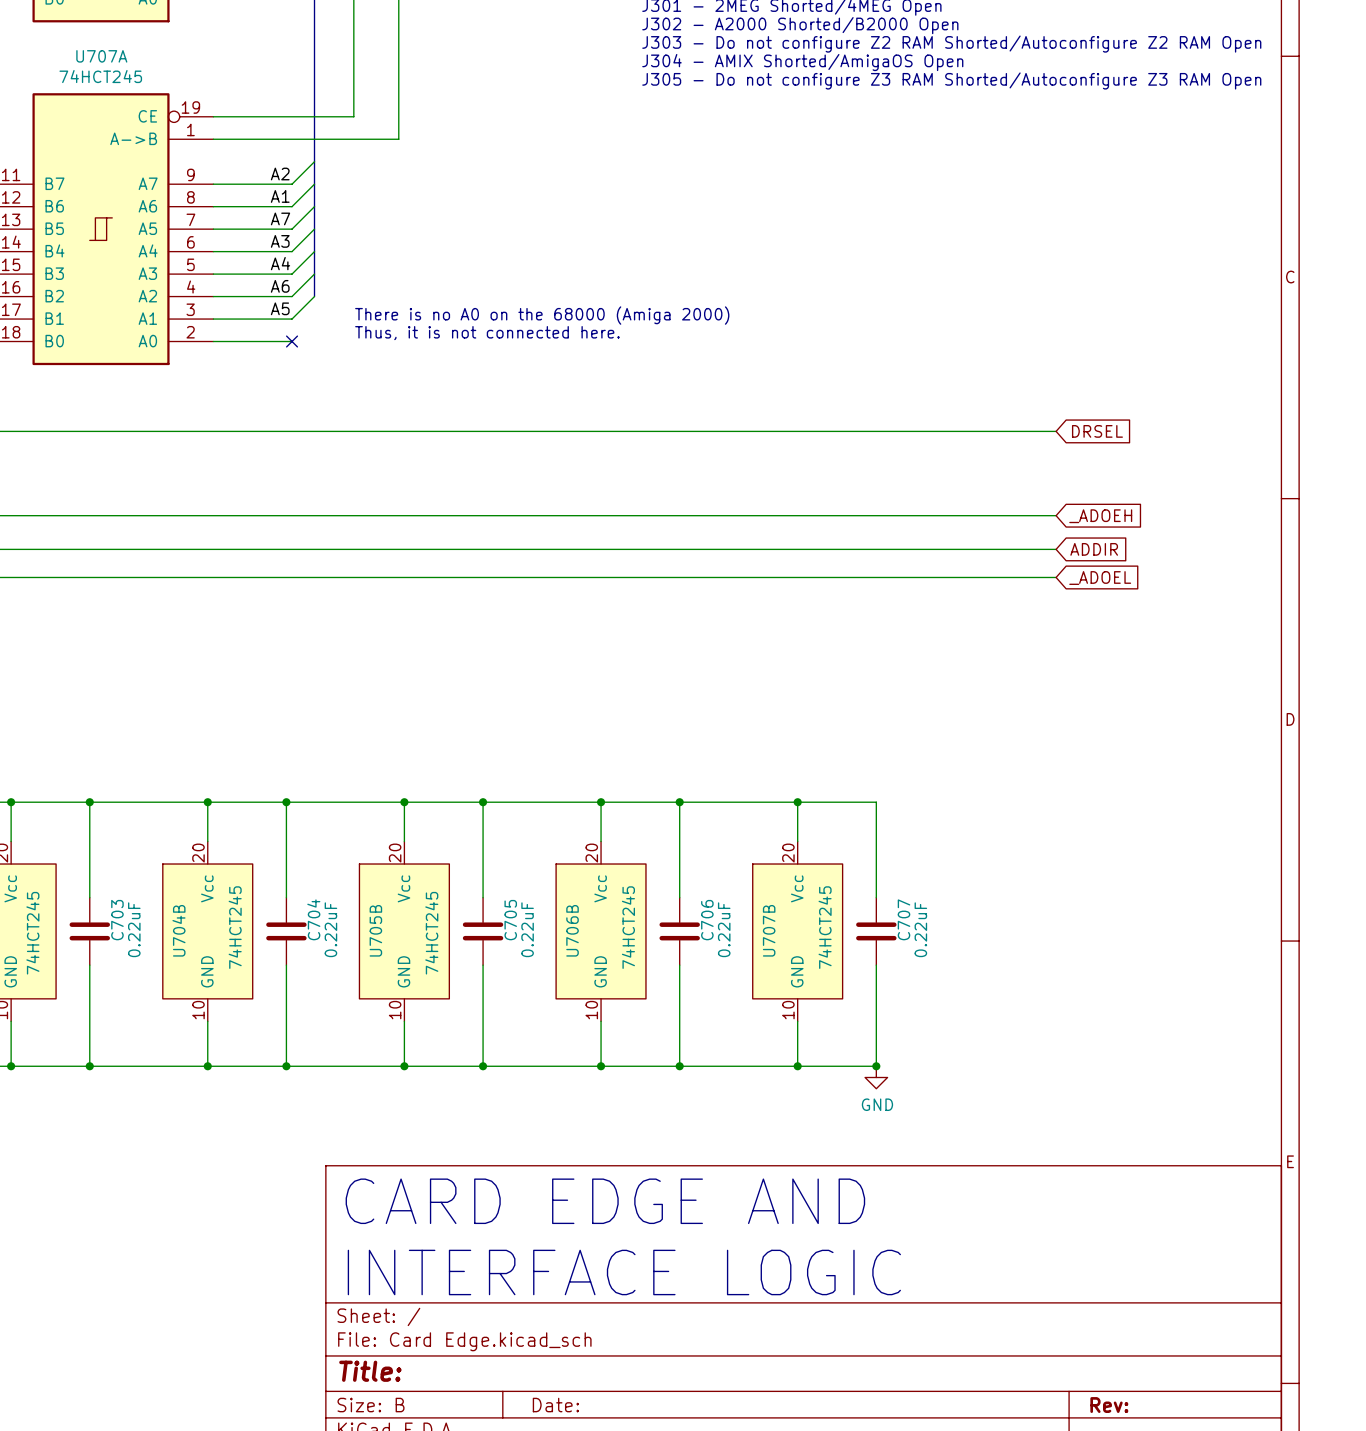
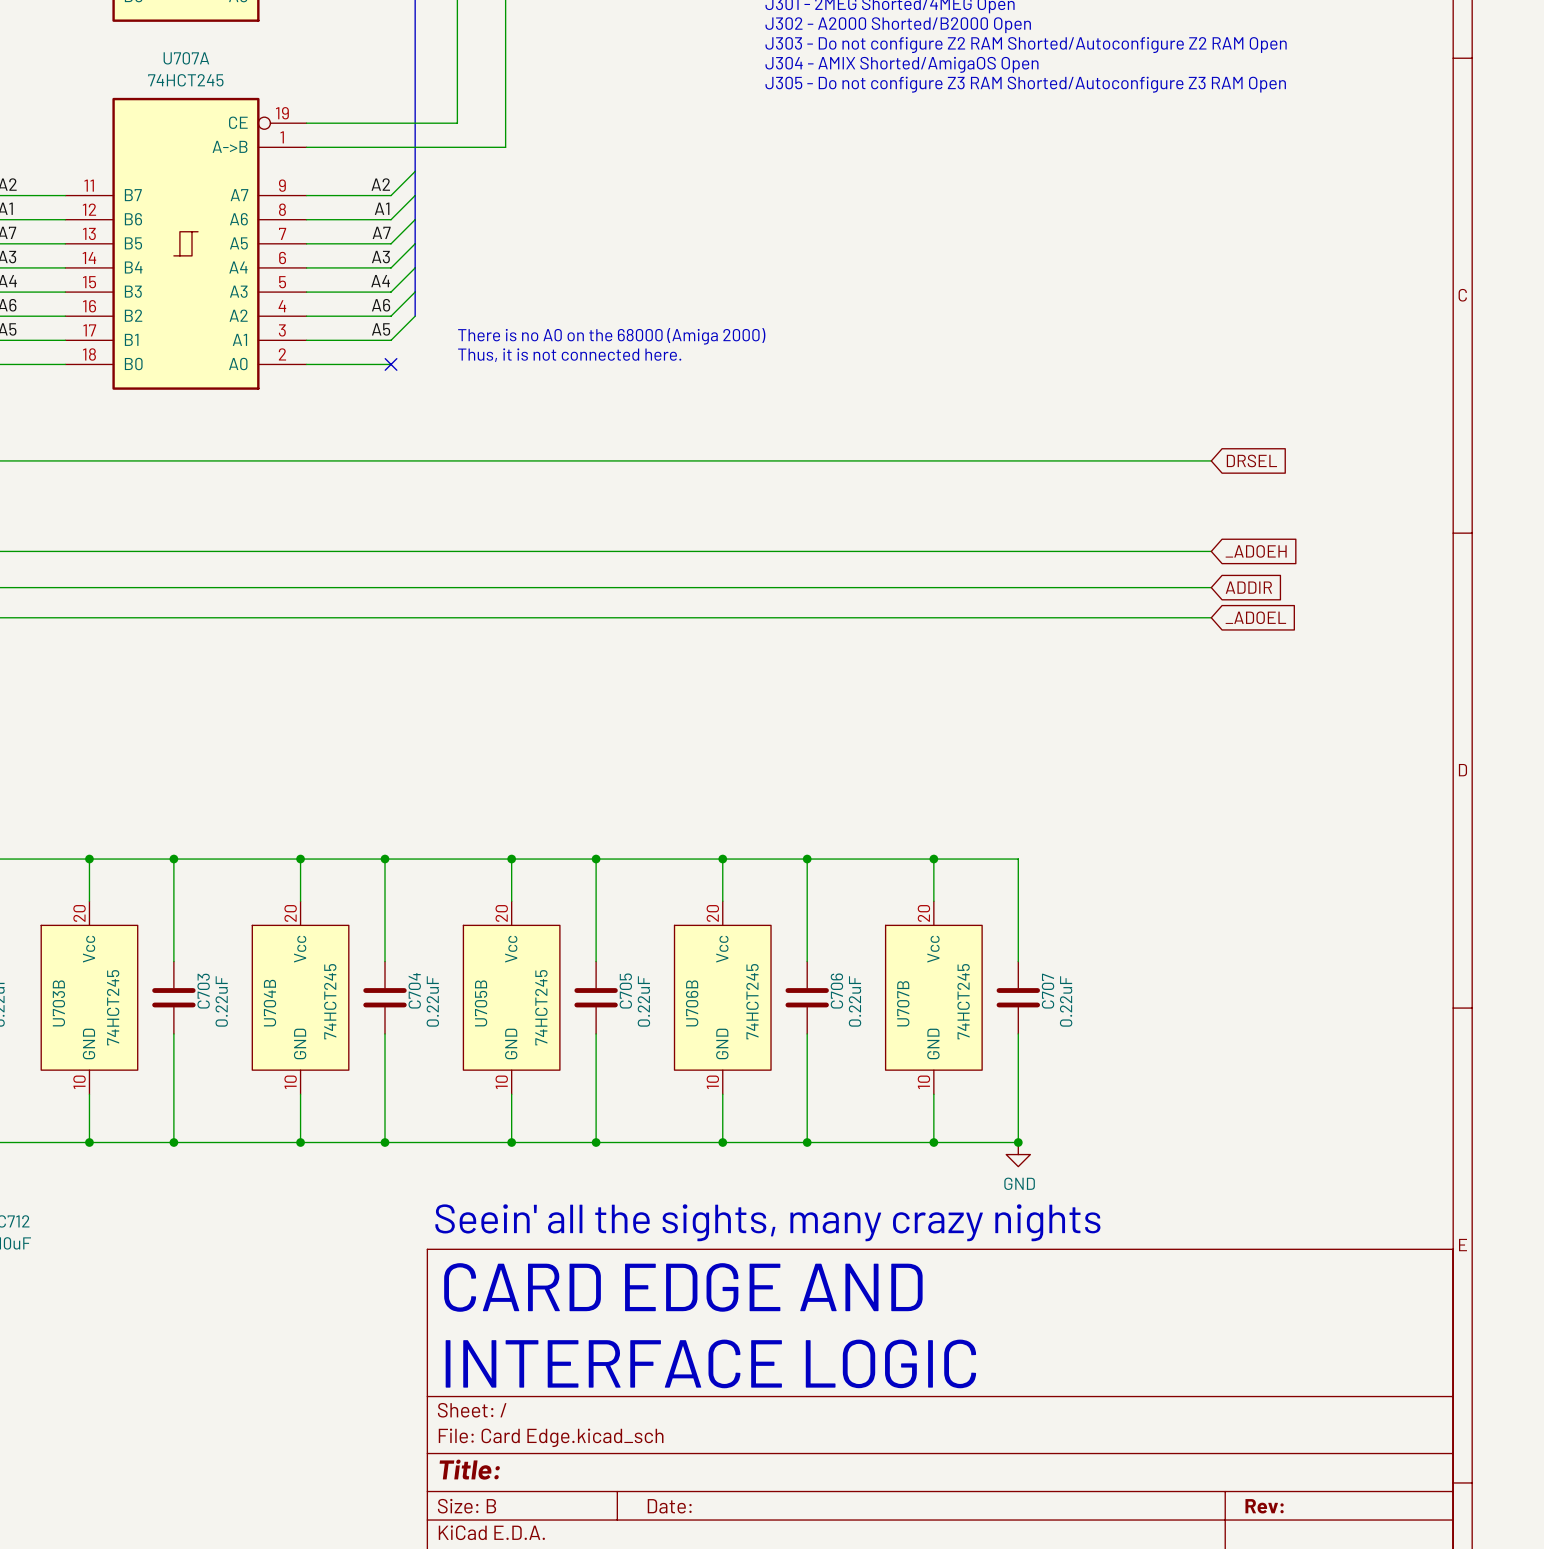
text: none -> Seein' all the sights, many crazy nights (767, 1222)

